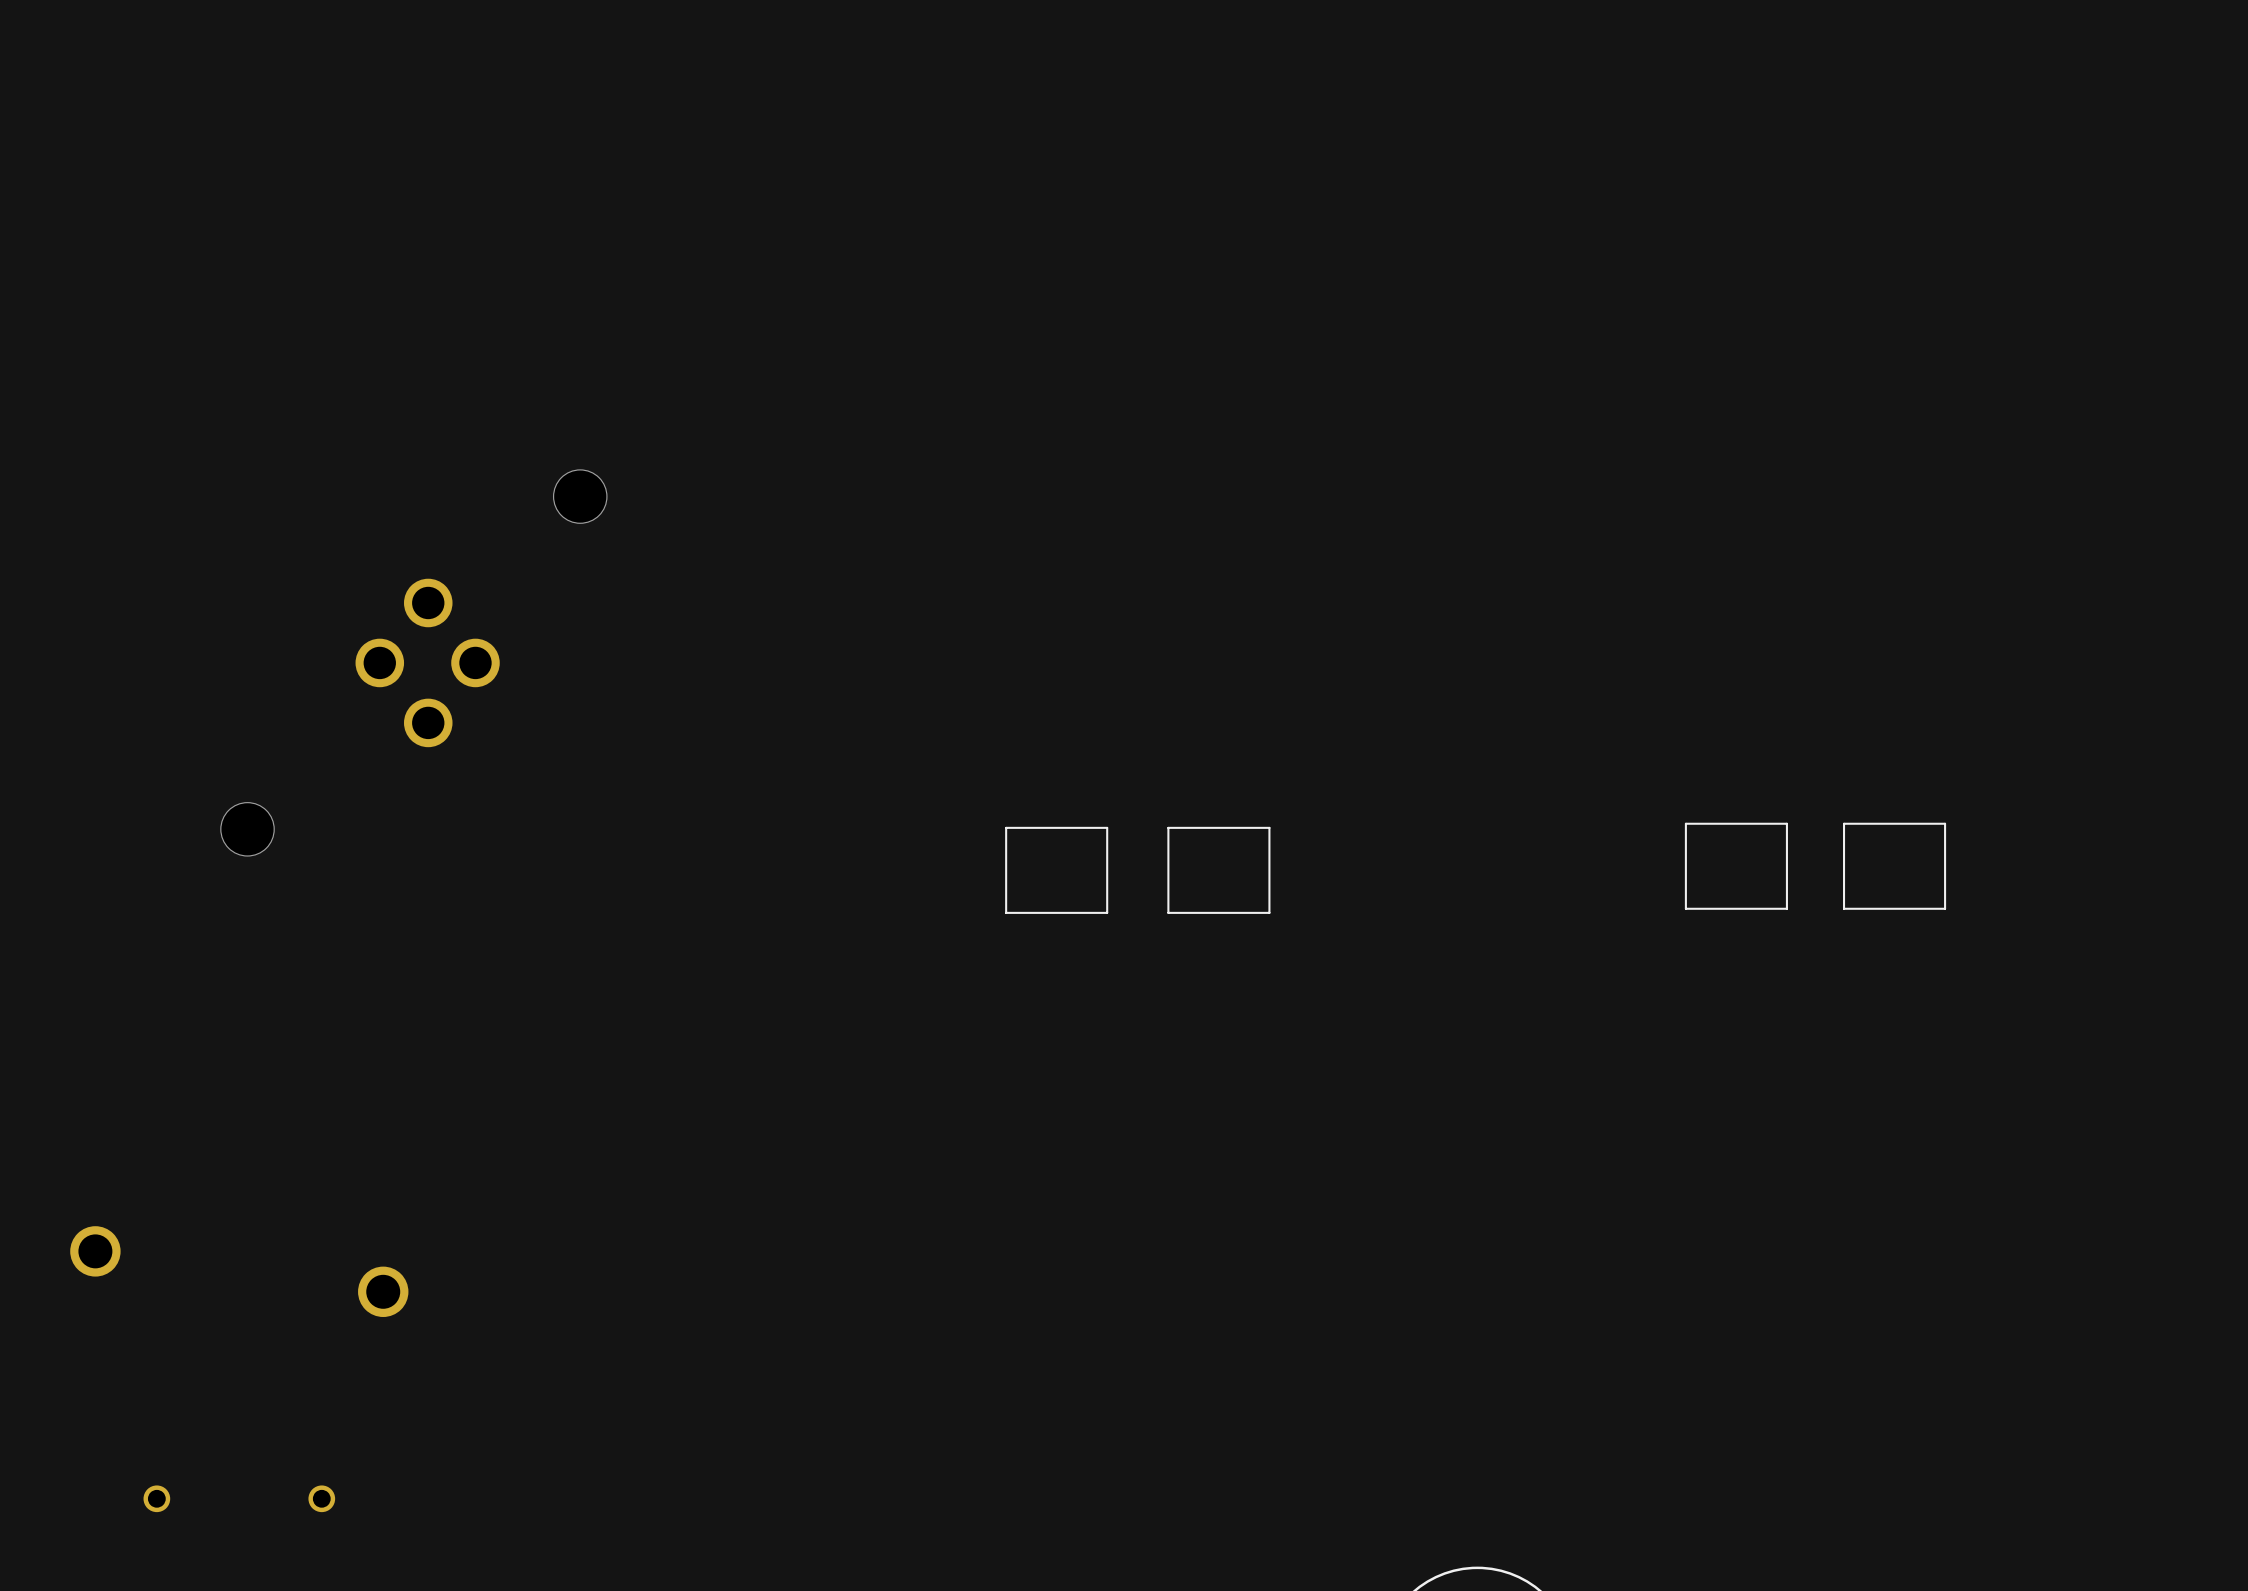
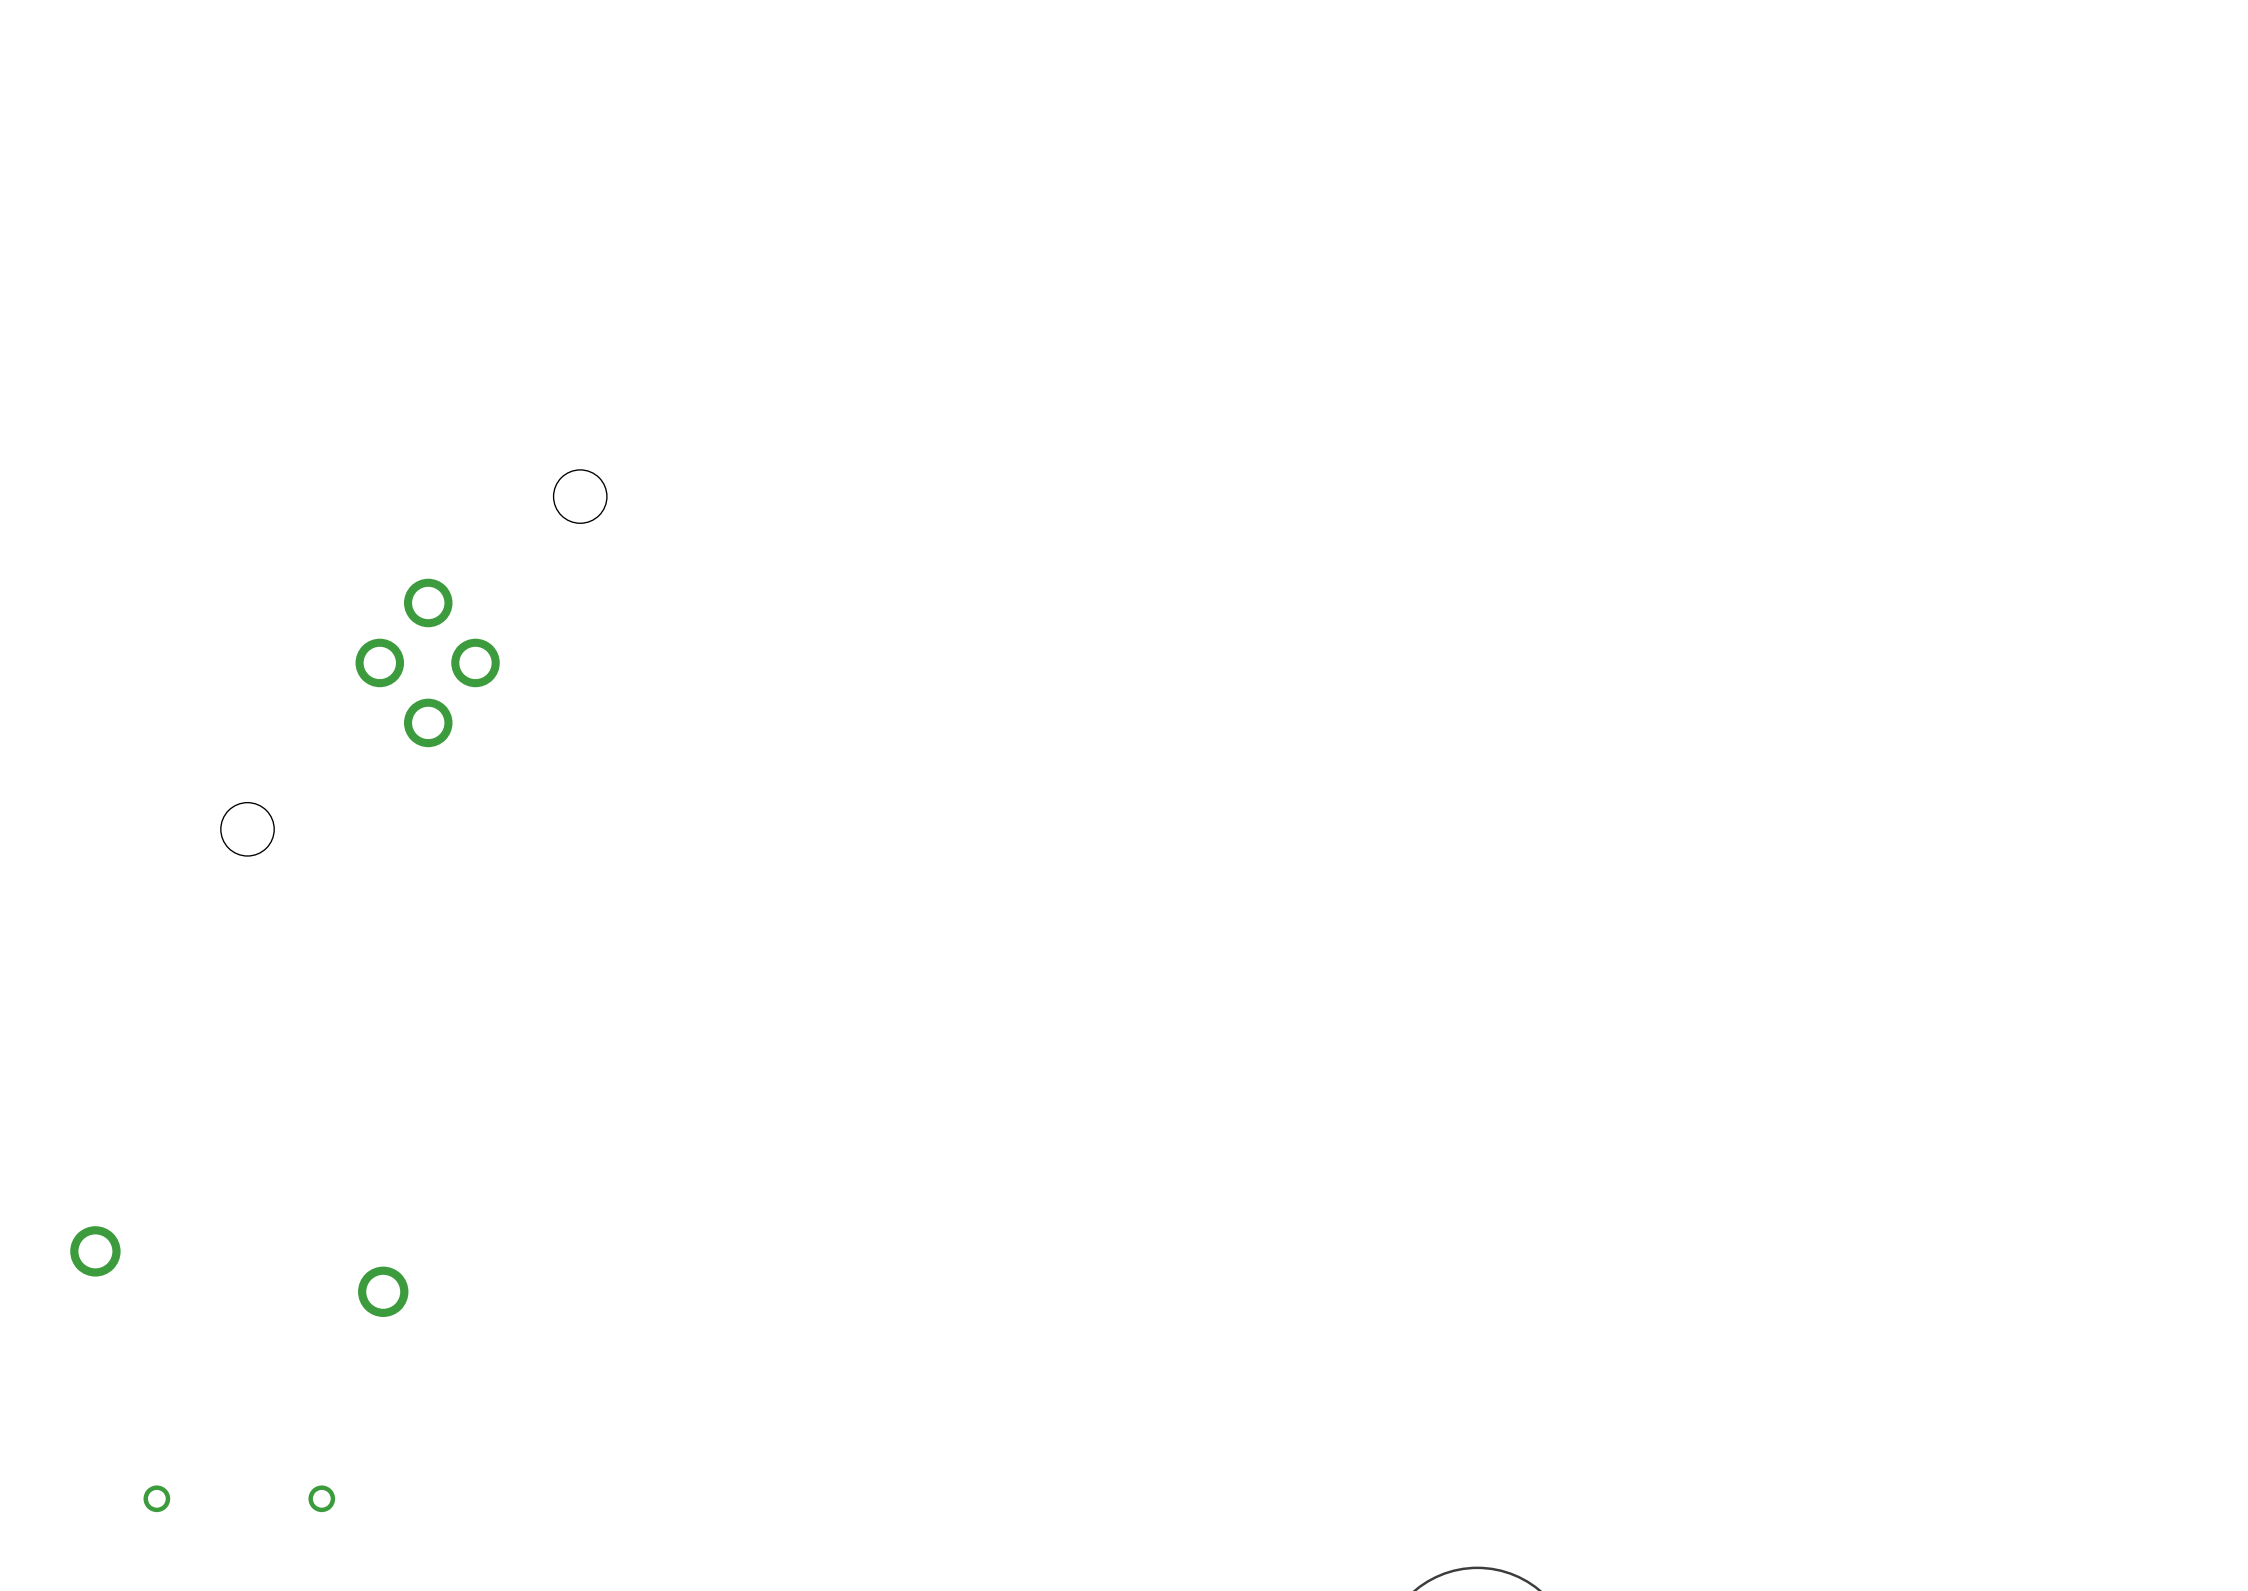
part: (1736, 866) -> none
part: (1894, 866) -> none
part: (1056, 870) -> none
part: (1218, 870) -> none

